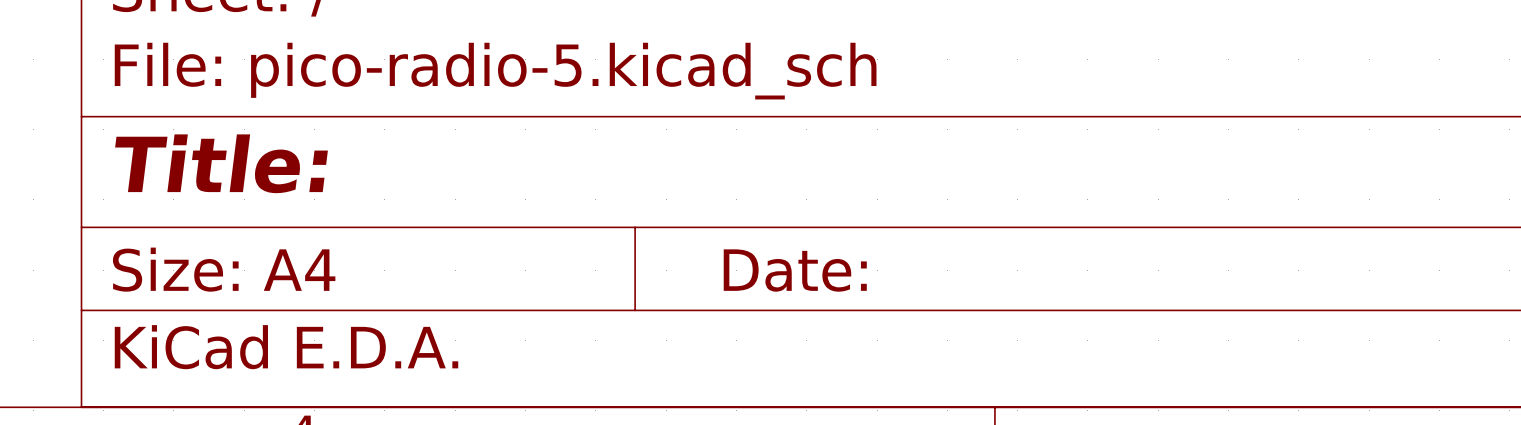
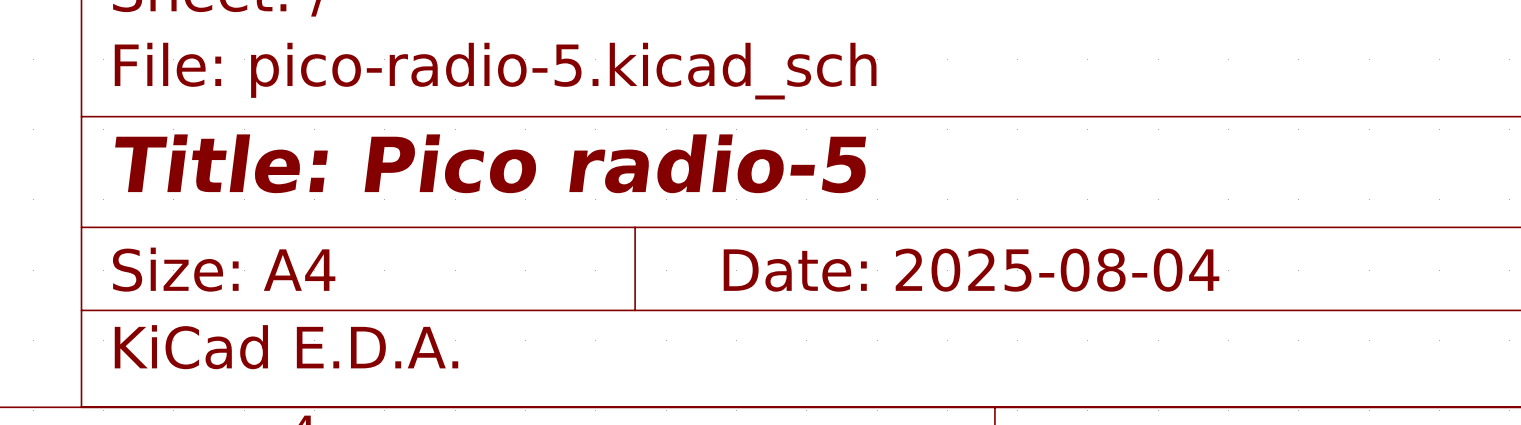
title block: Title: (221, 163) -> Title: Pico radio-5 (490, 163)
title block: Date: (795, 270) -> Date: 2025-08-04 (971, 270)

